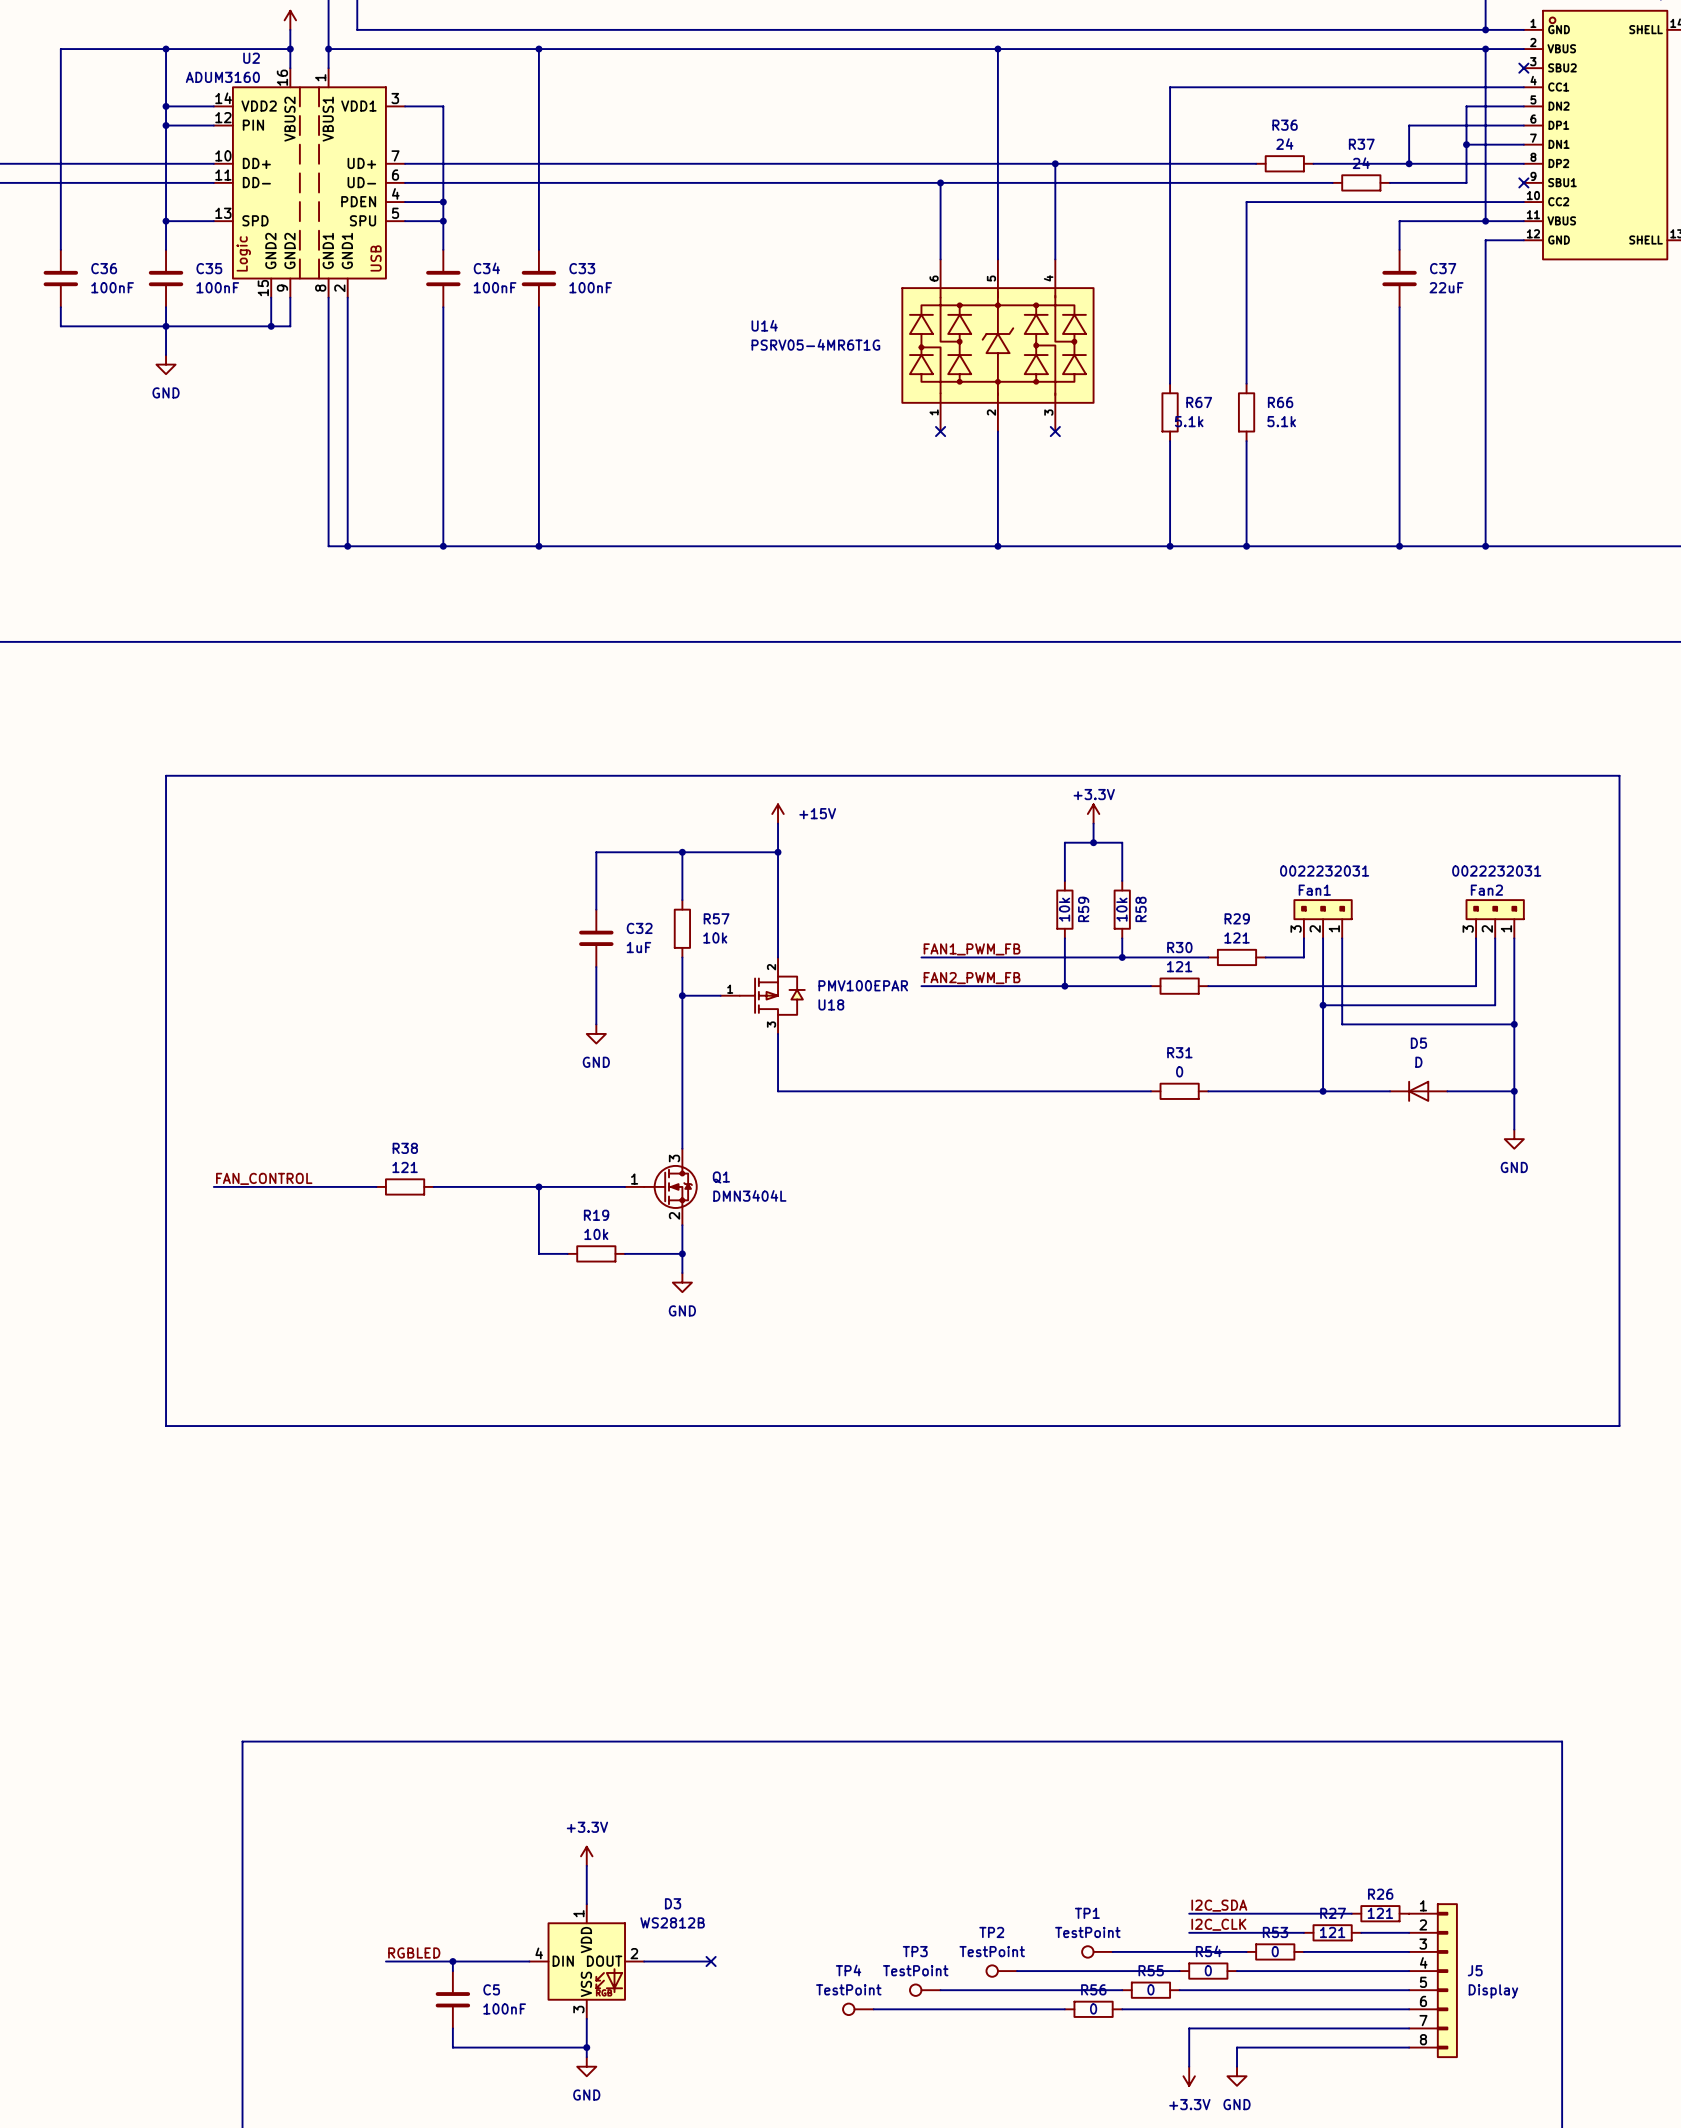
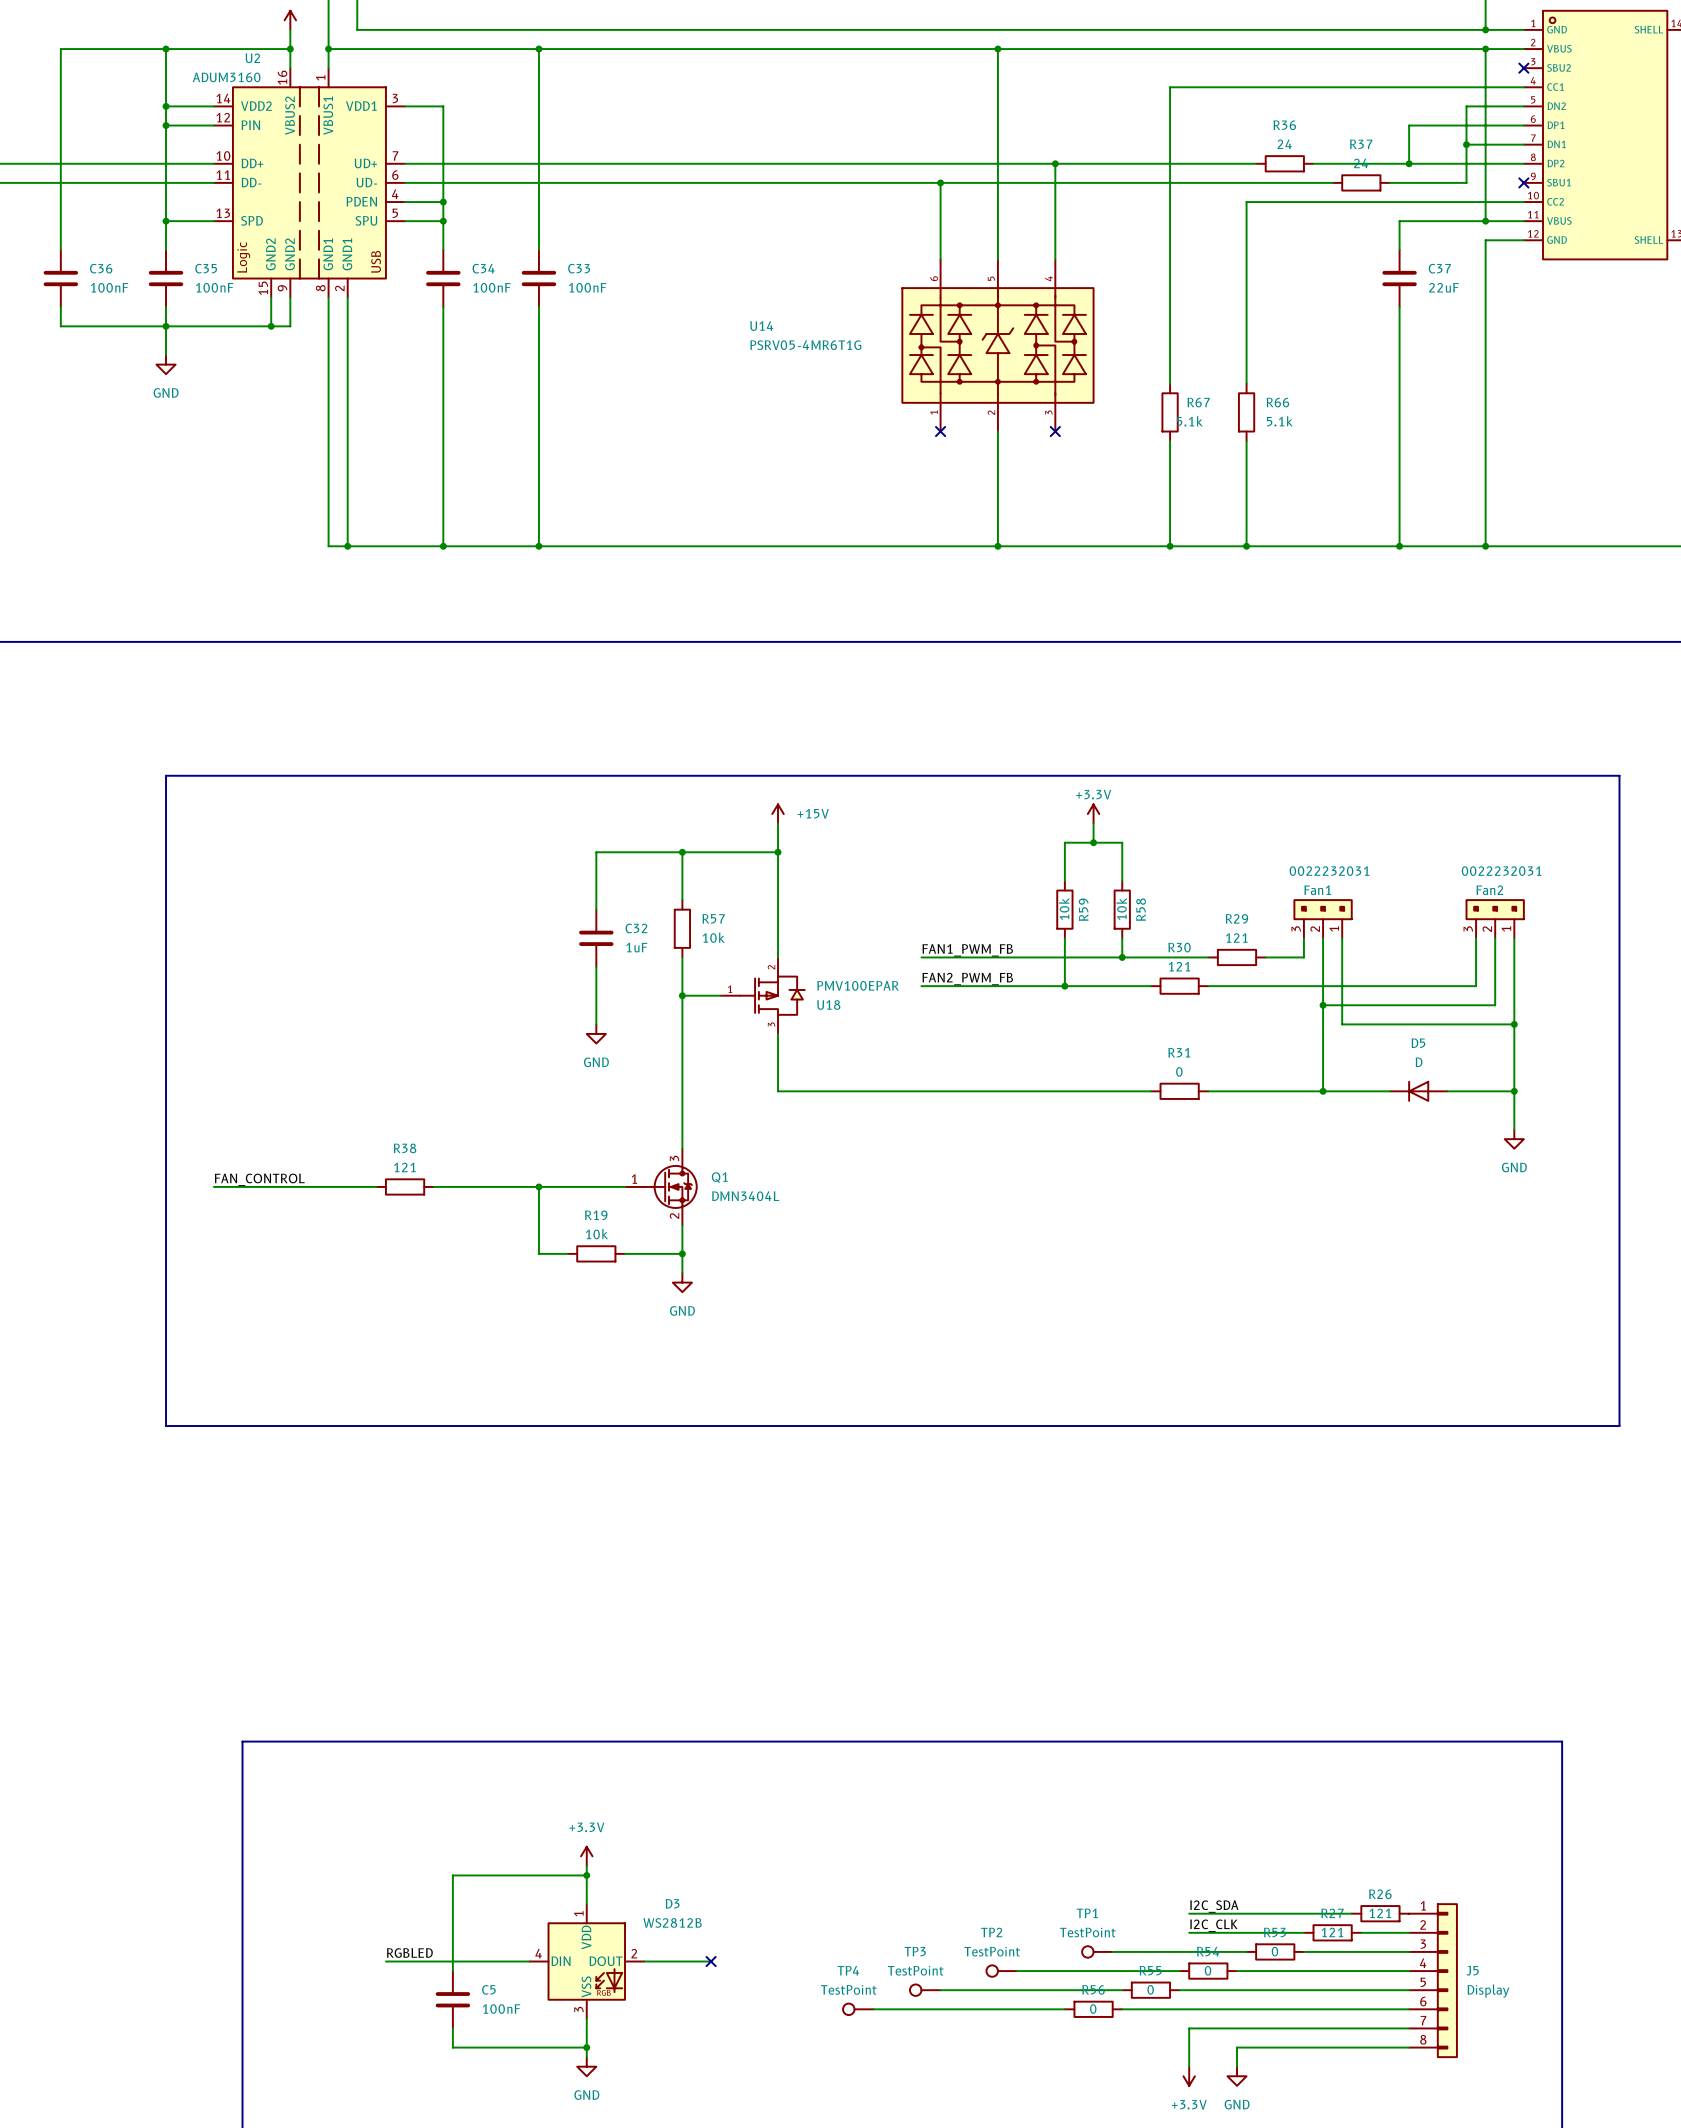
wire: none -> (586, 1875) (452, 1875) (452, 1961)
junction: none -> (586, 1875)
junction: (452, 1961) -> none

